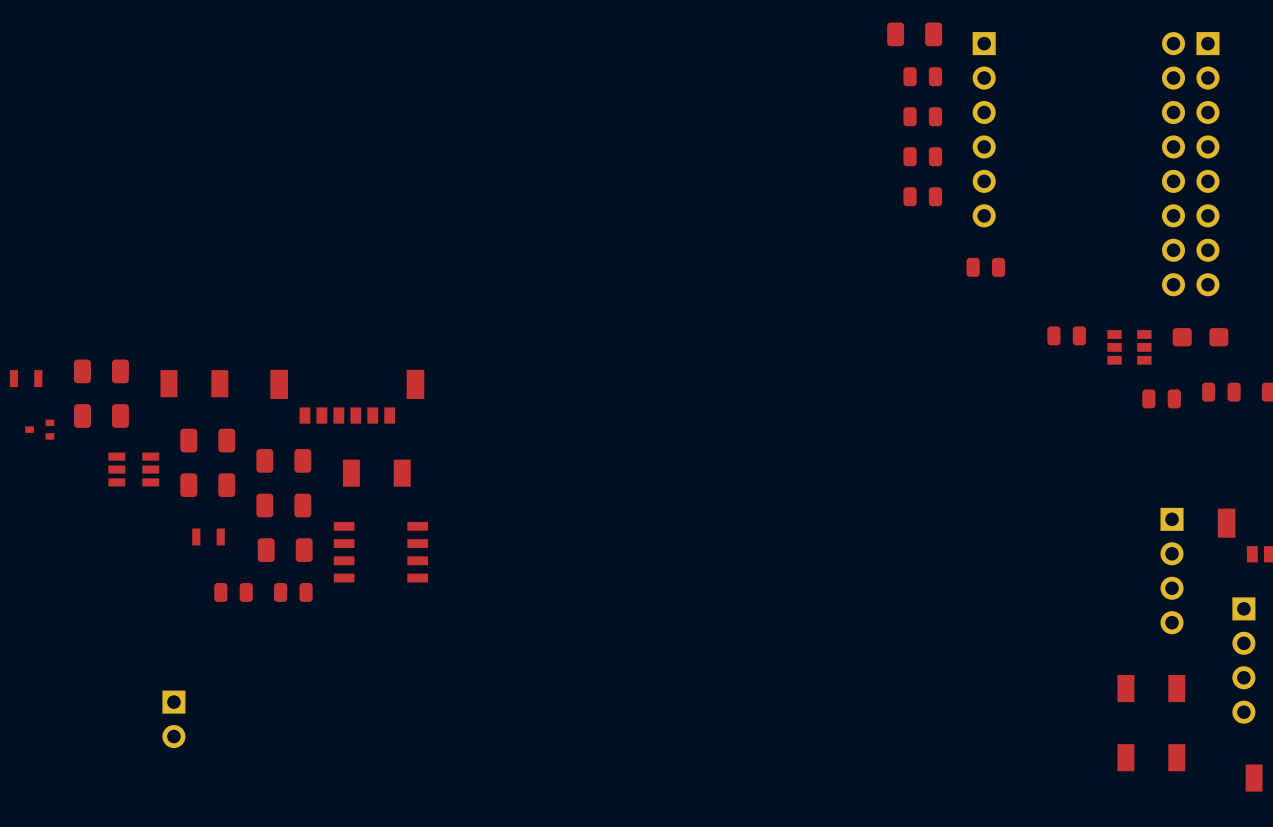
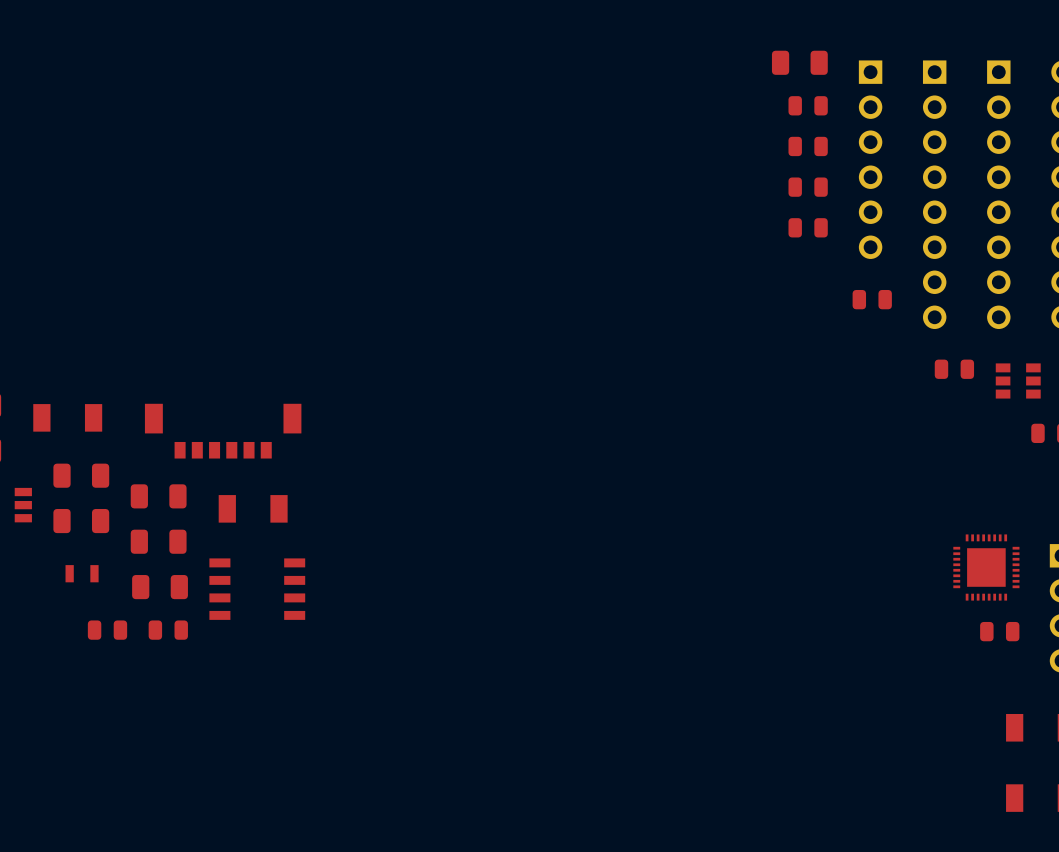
part: none -> (934, 194)
part: none -> (998, 194)
part: none -> (986, 567)
part: none -> (999, 631)
part: (173, 719) -> none

